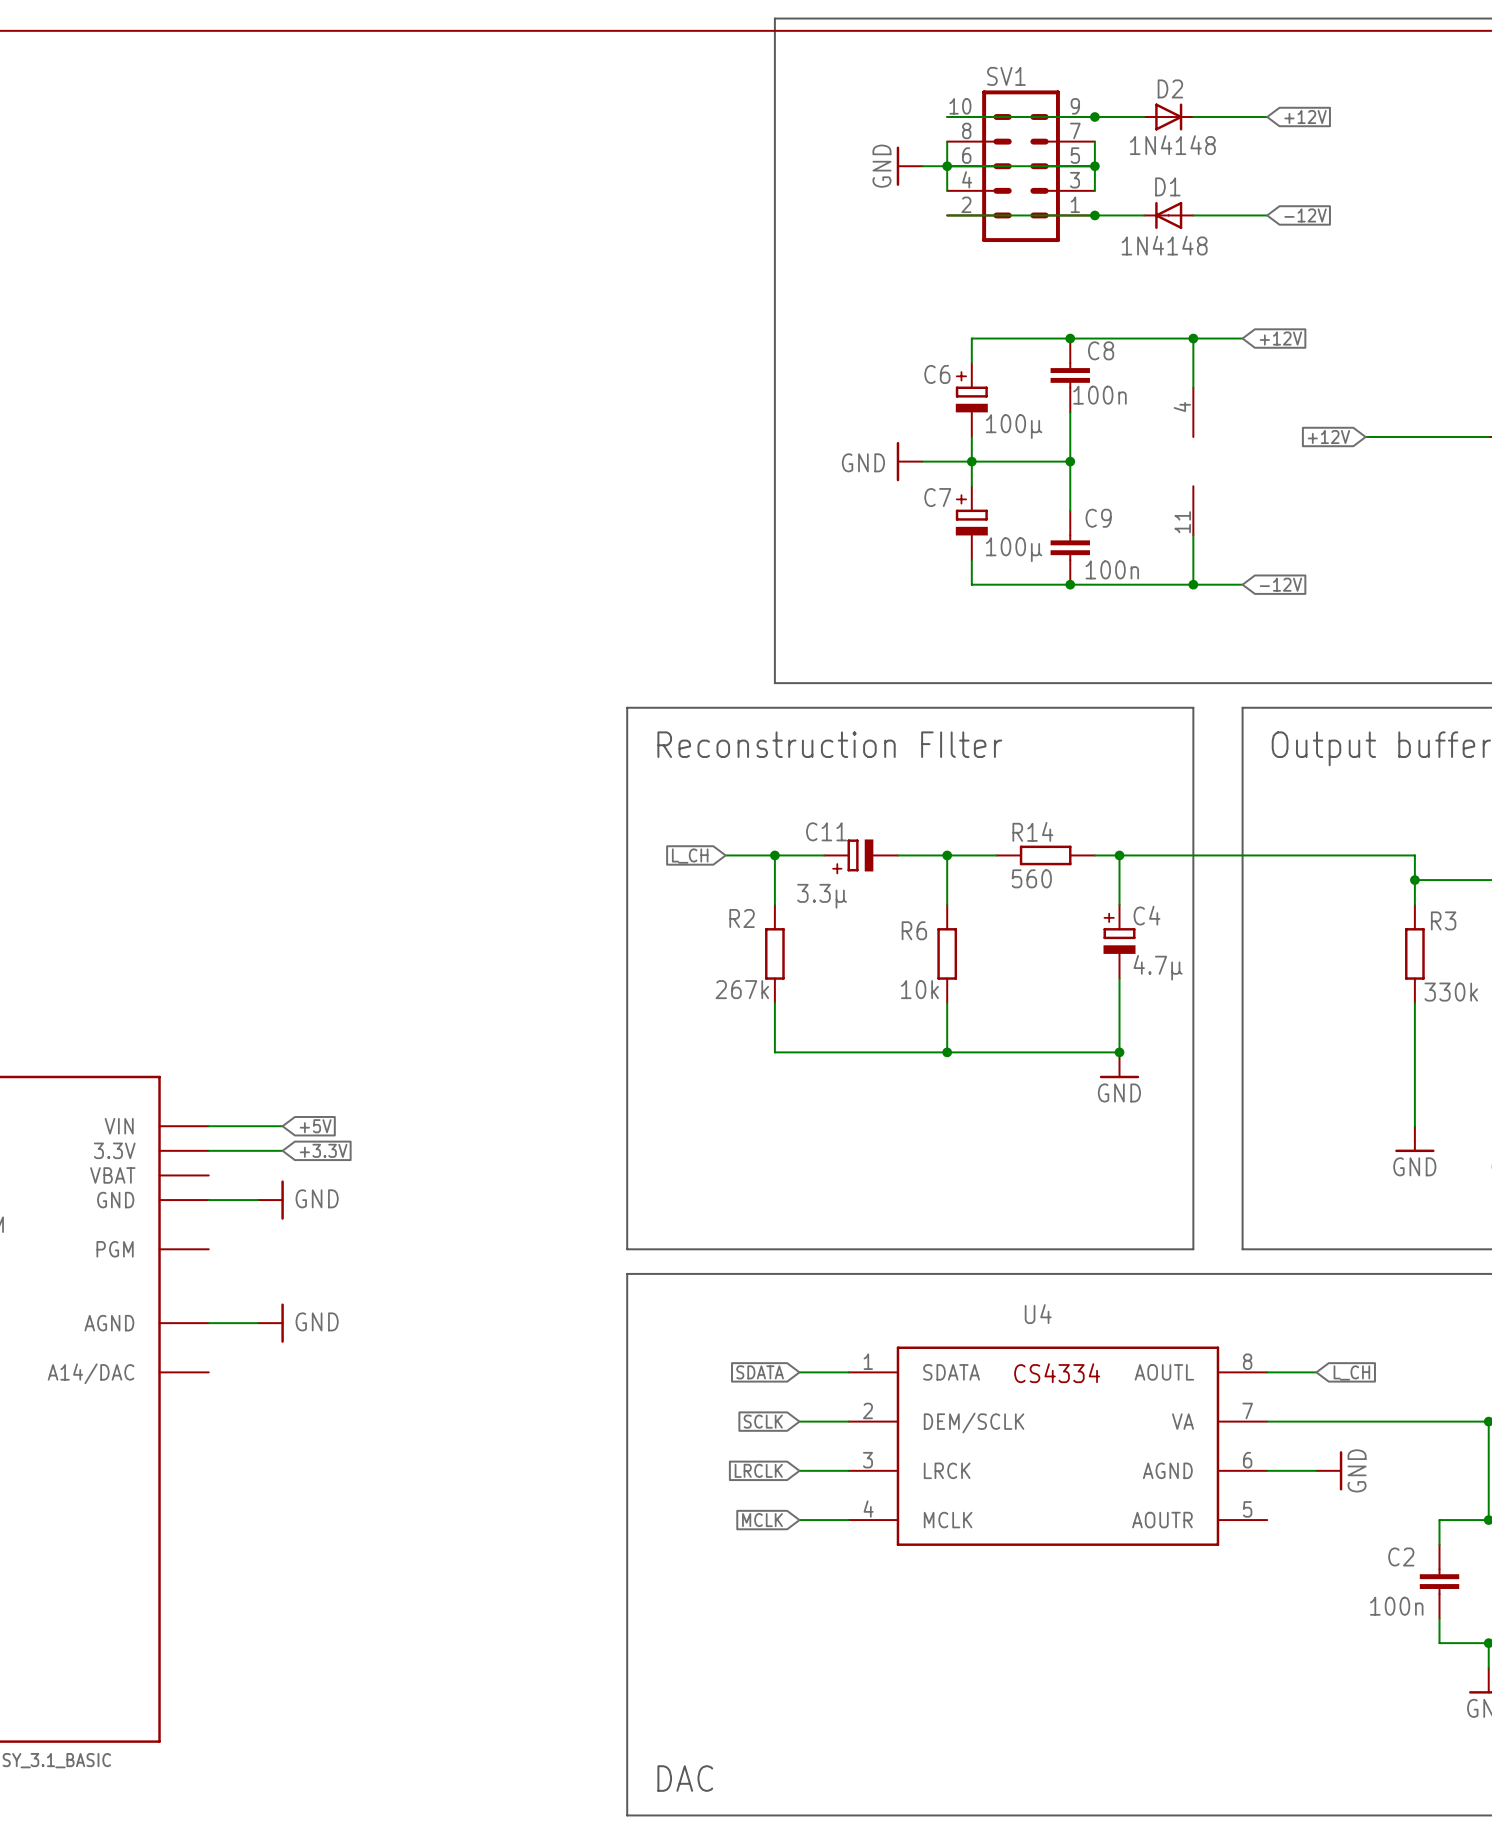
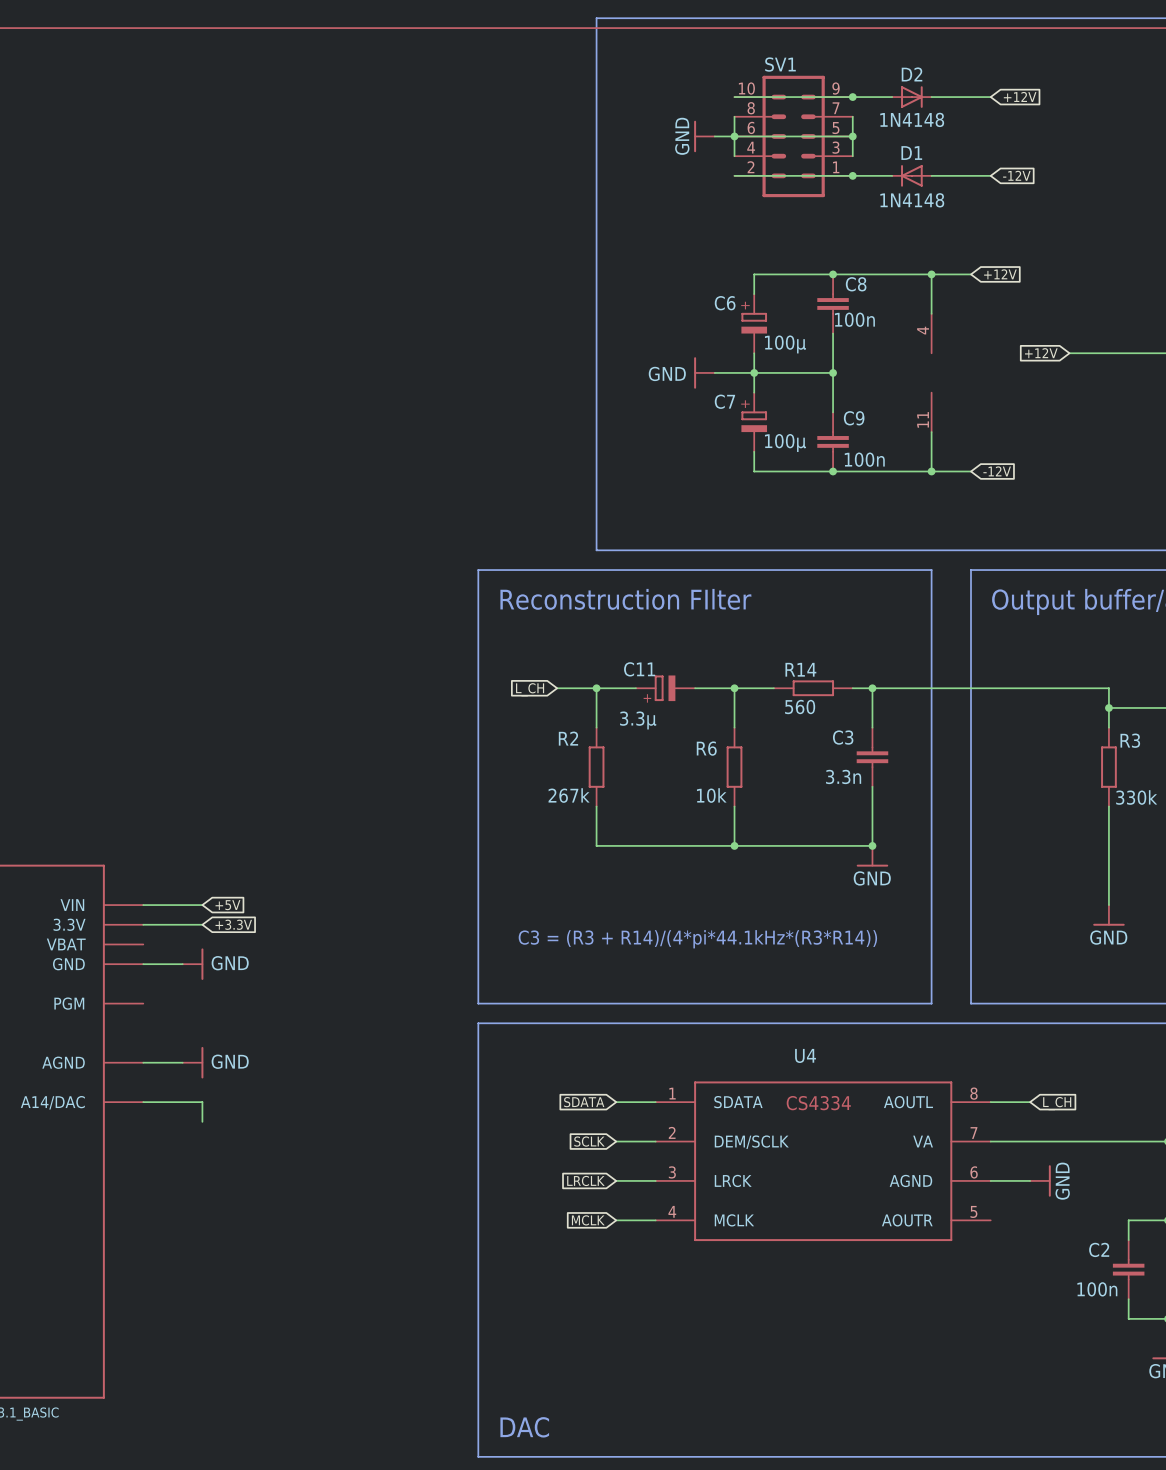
C4: 4.7µ (1119, 941) -> none
C3: none -> 3.3n (872, 757)
text: none -> C3 = (R3 + R14)/(4*pi*44.1kHz*(R3*R14)) (697, 939)
wire: none -> (143, 1102) (202, 1102) (202, 1121)

